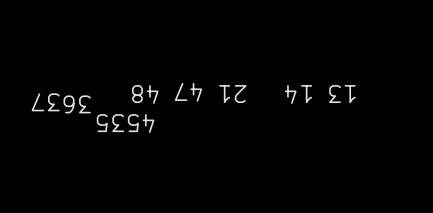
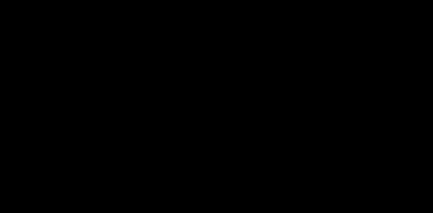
text: 47 (188, 92) -> none
text: 48 (145, 94) -> none
text: 21 (232, 94) -> none
text: 14 (298, 94) -> none
text: 13 (342, 94) -> none
text: 37 (45, 102) -> none
text: 36 (77, 104) -> none
text: 35 (110, 123) -> none
text: 45 (141, 123) -> none

